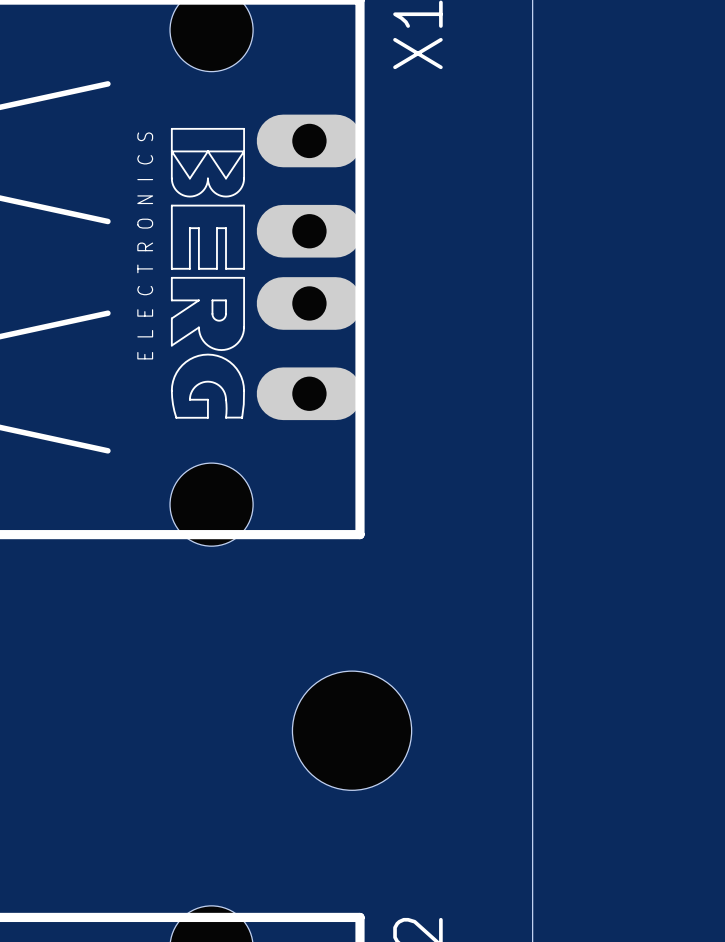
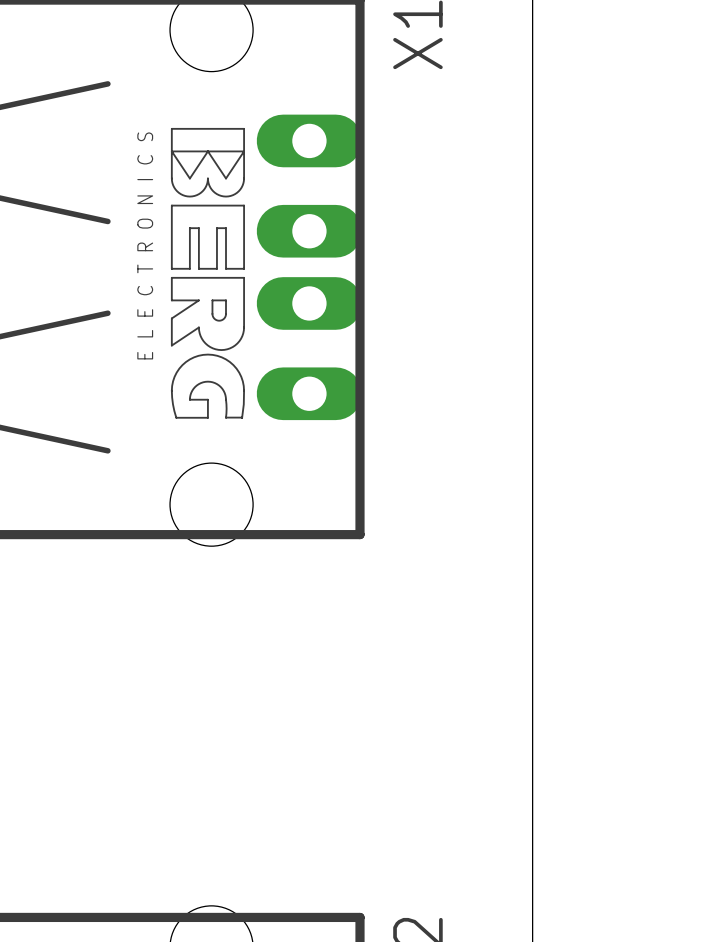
hole: (352, 730) -> none

